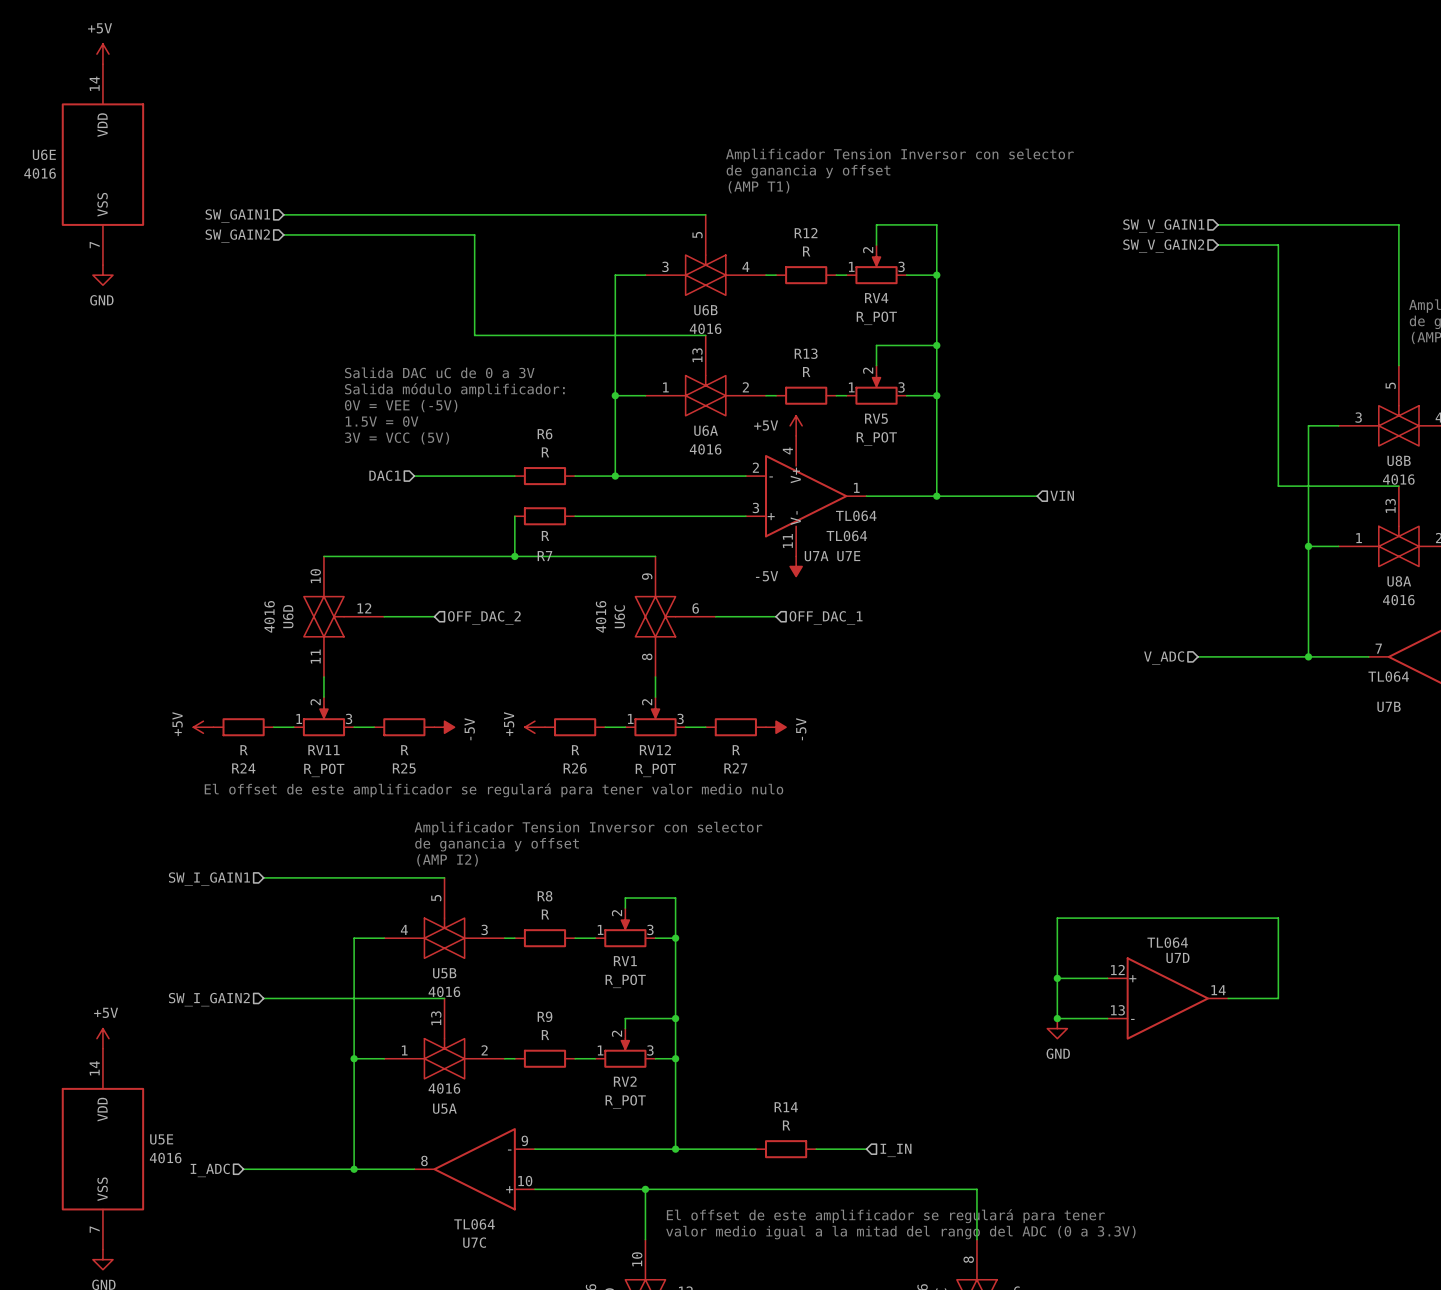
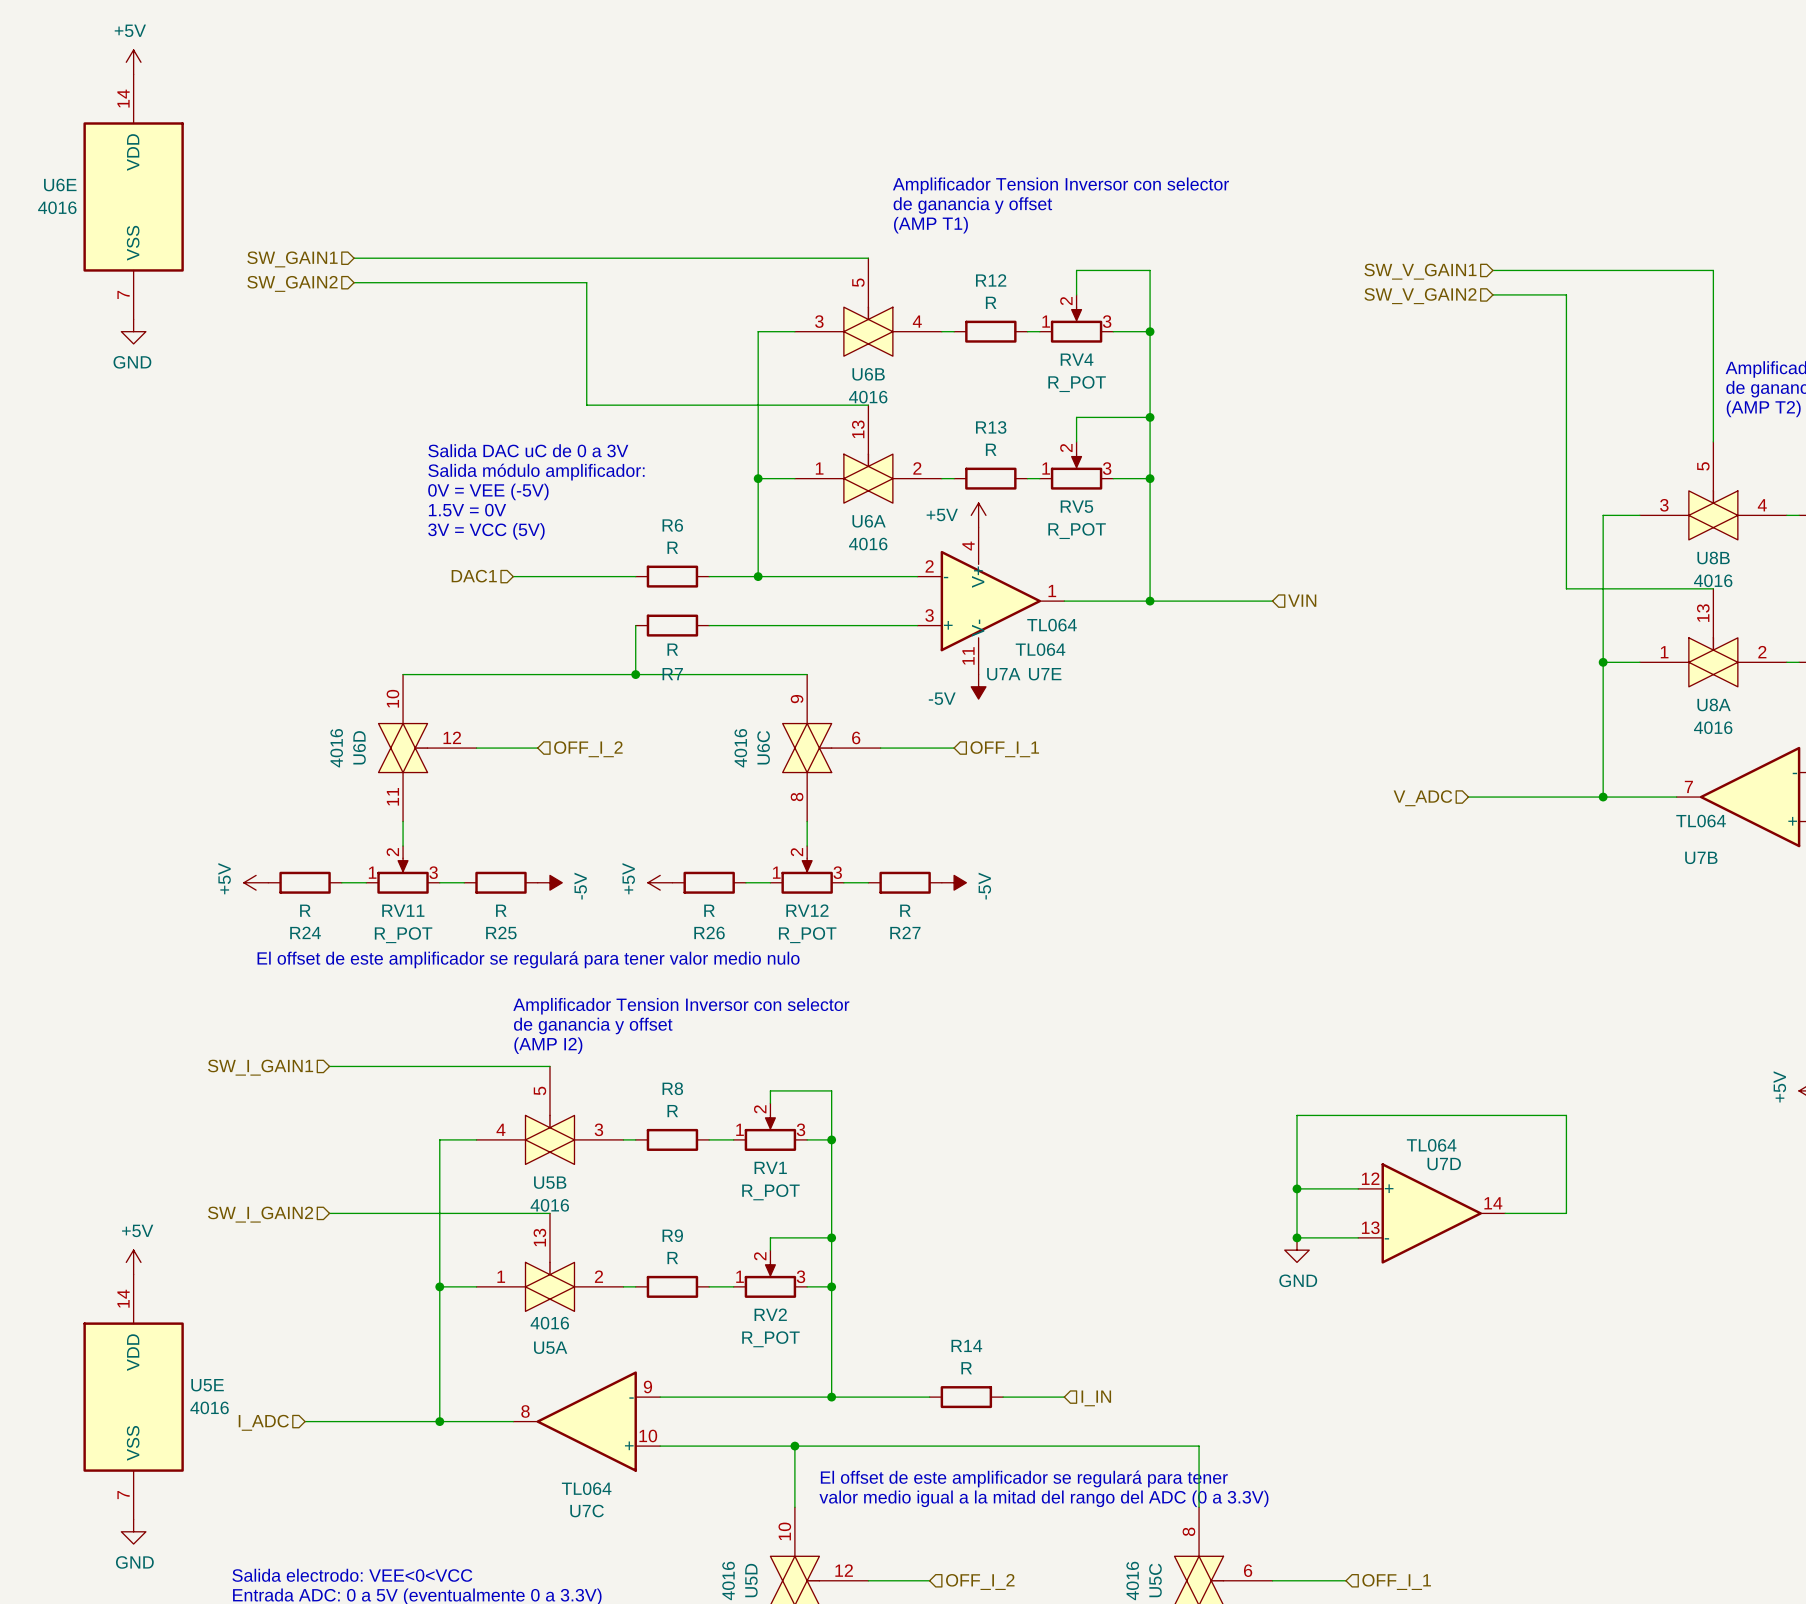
hierarchical label: OFF_DAC_2 (484, 617) -> OFF_I_2 (588, 749)
hierarchical label: OFF_DAC_1 (826, 617) -> OFF_I_1 (1004, 749)

